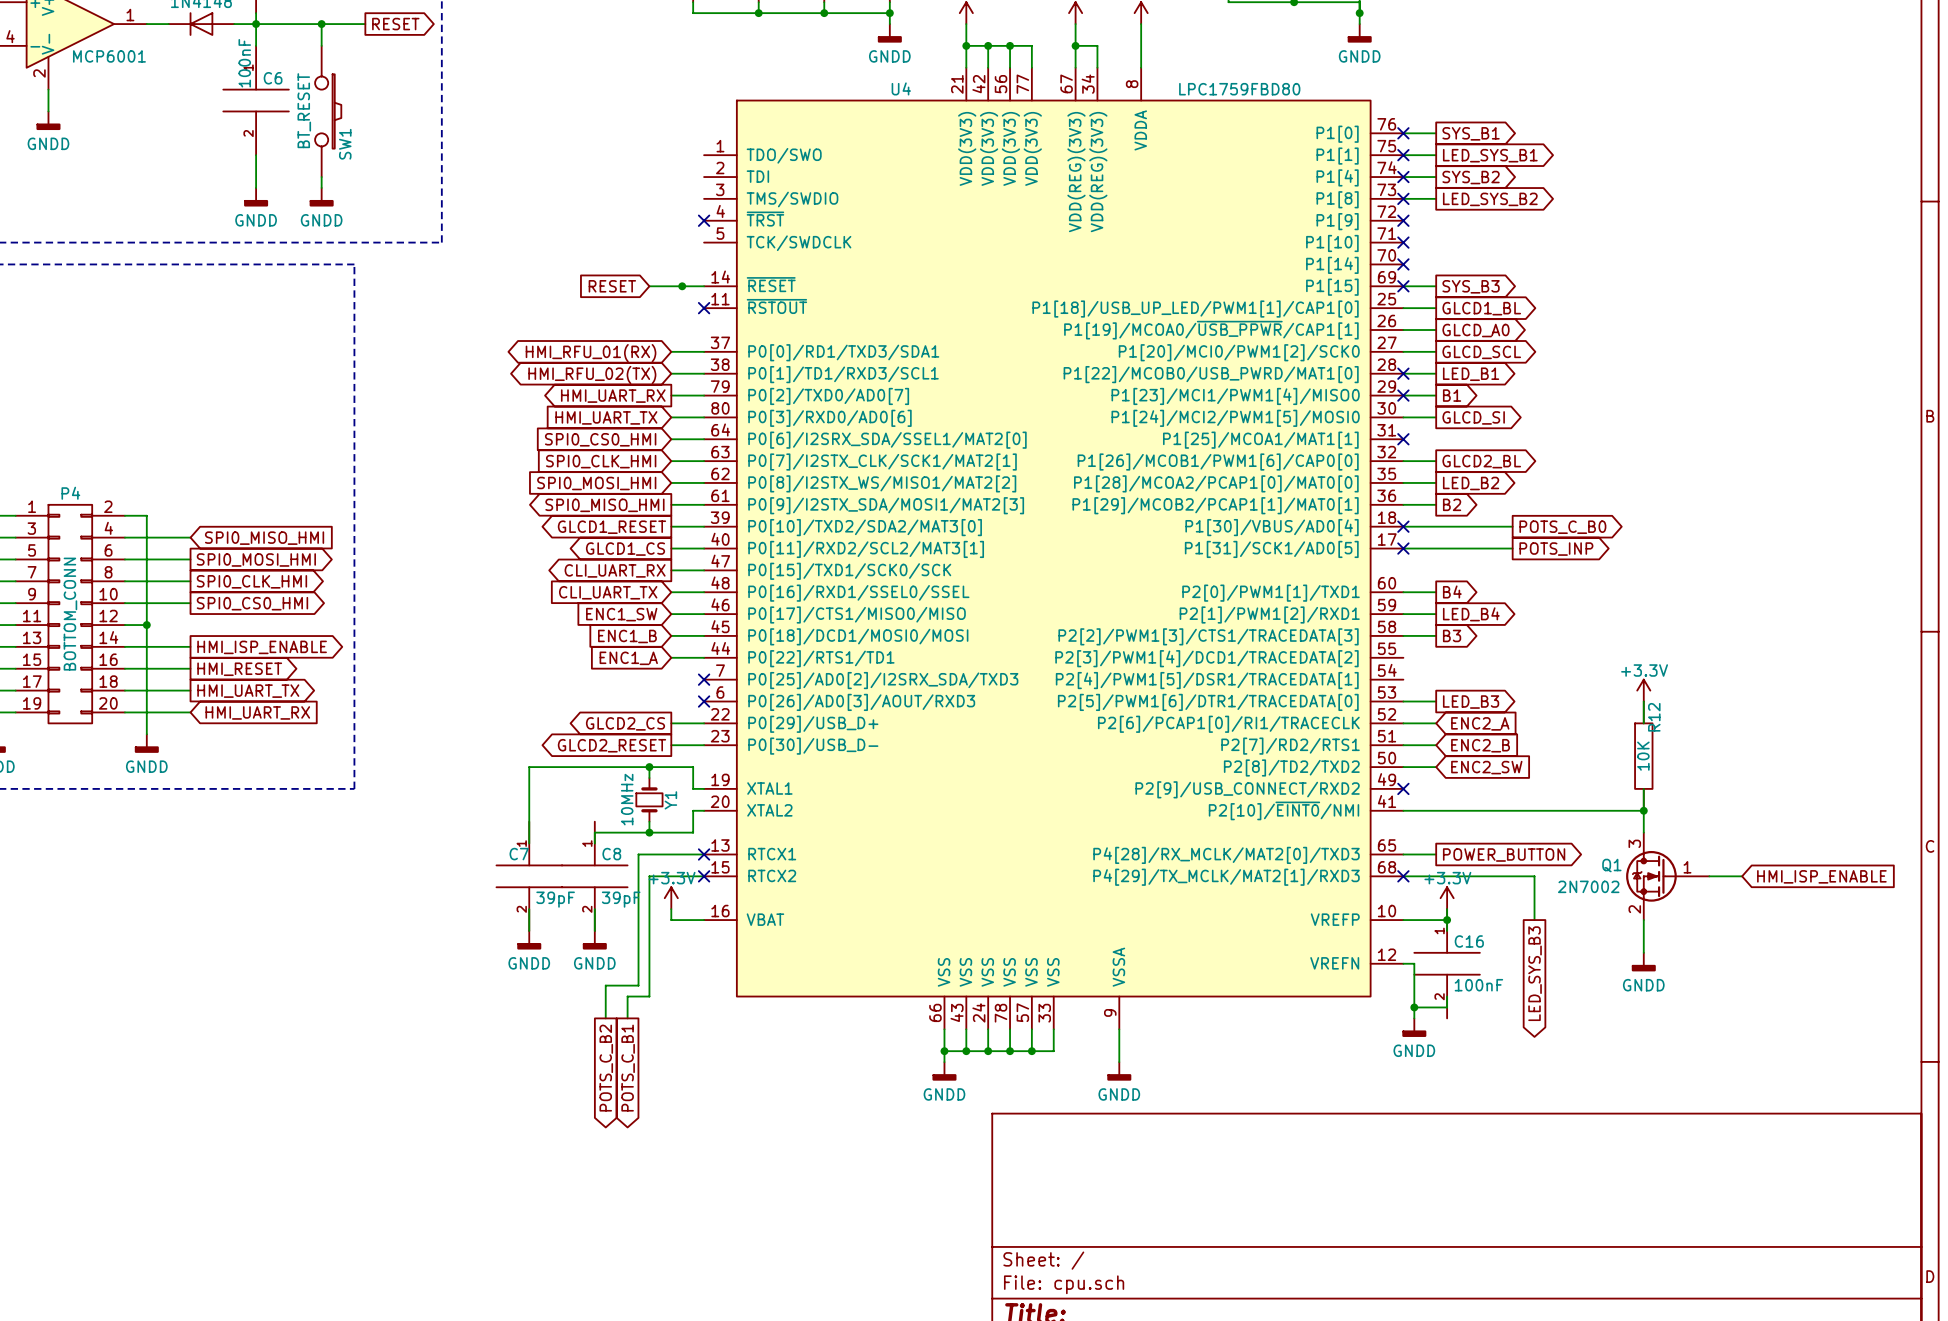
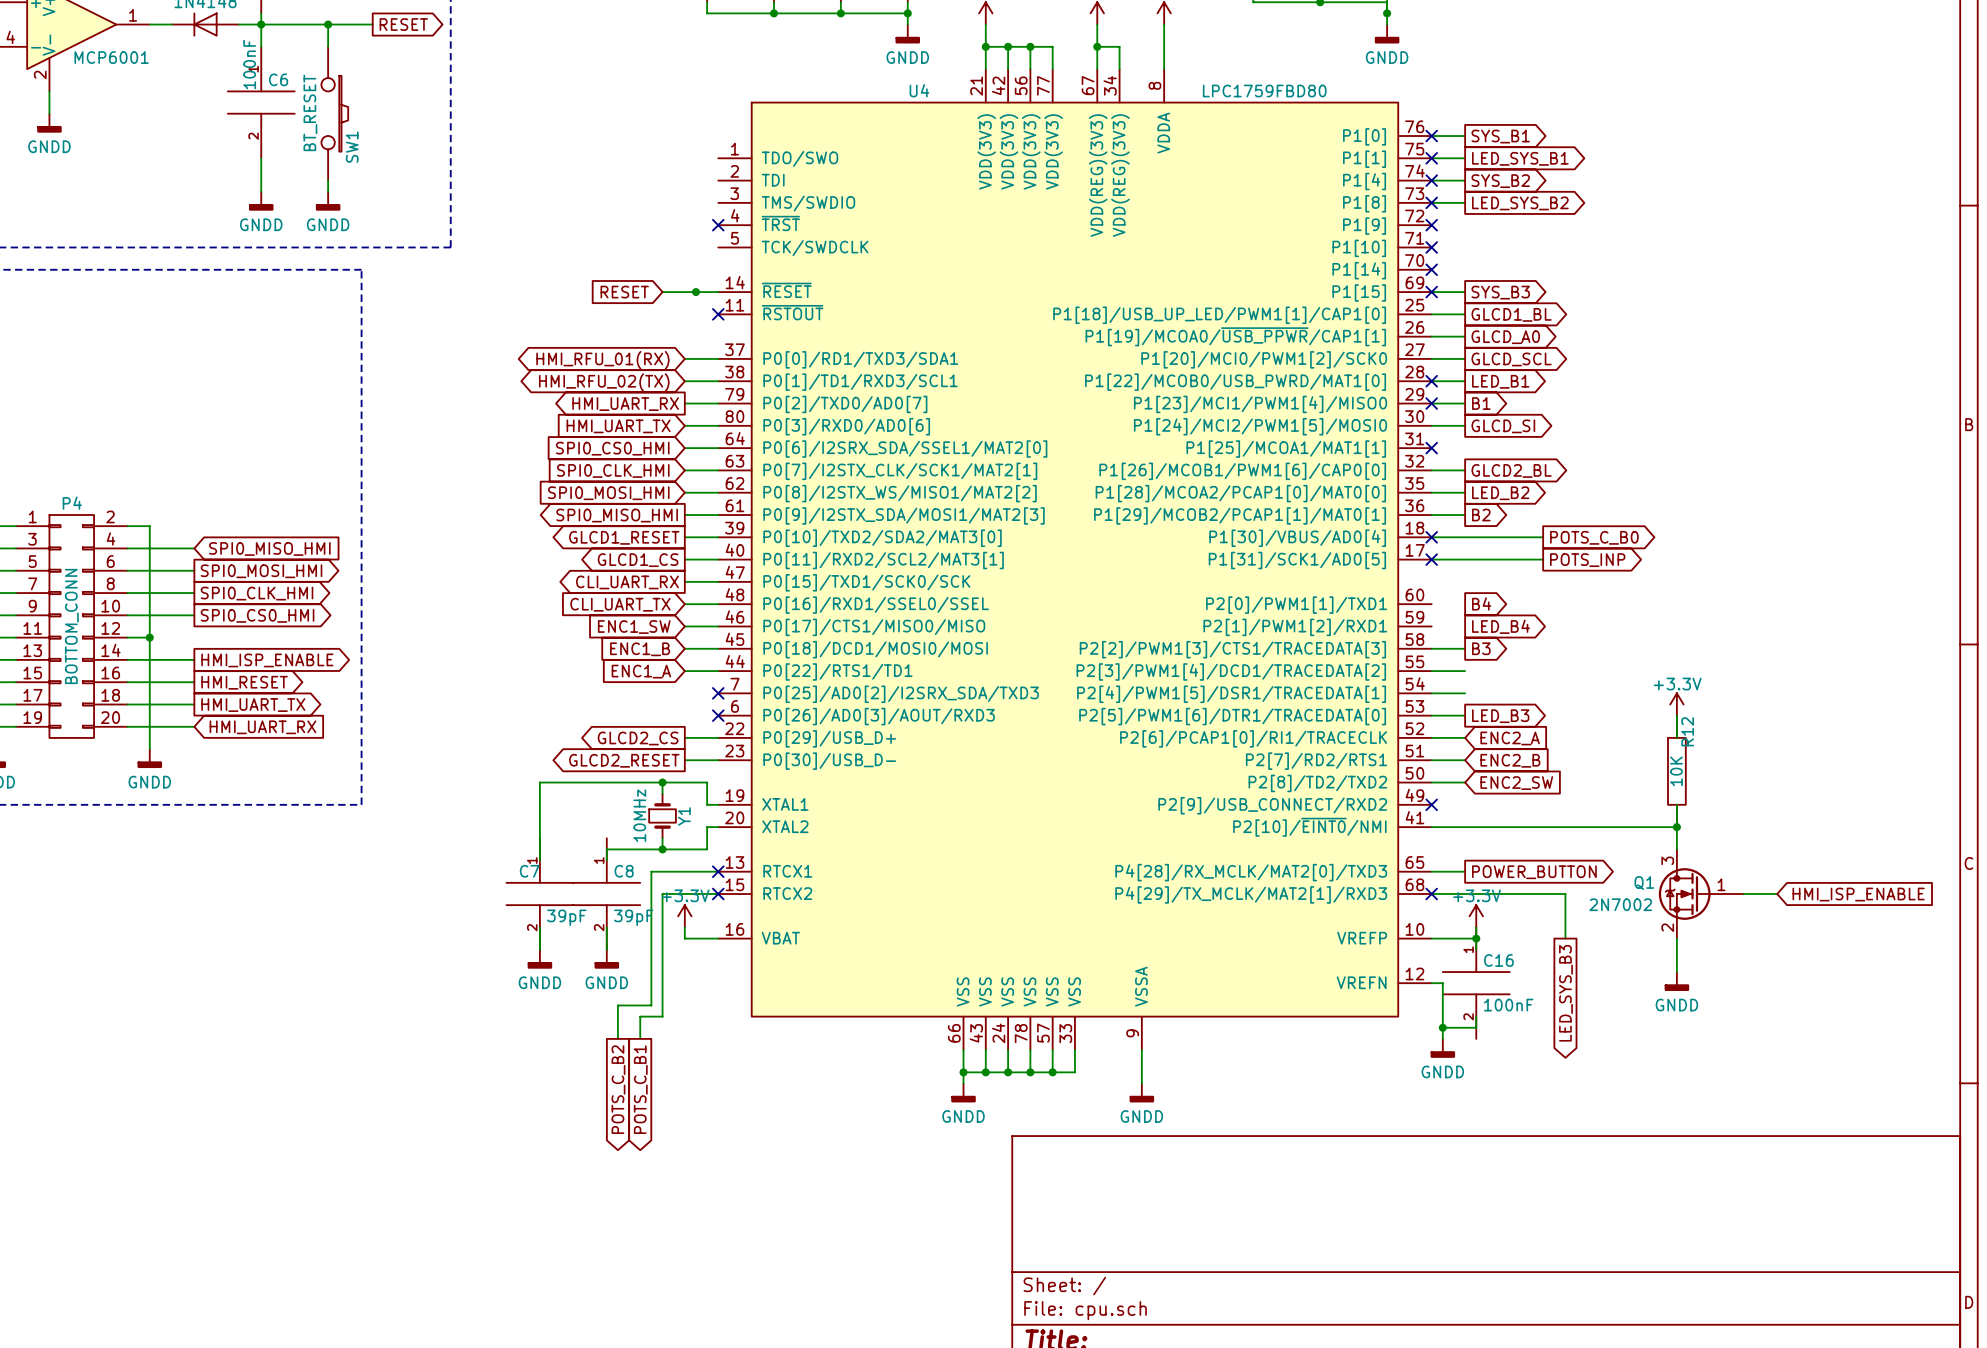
wire: (1403, 592) (1436, 592) -> (1431, 671) (1465, 671)
wire: (1403, 614) (1436, 614) -> (1431, 693) (1465, 693)

